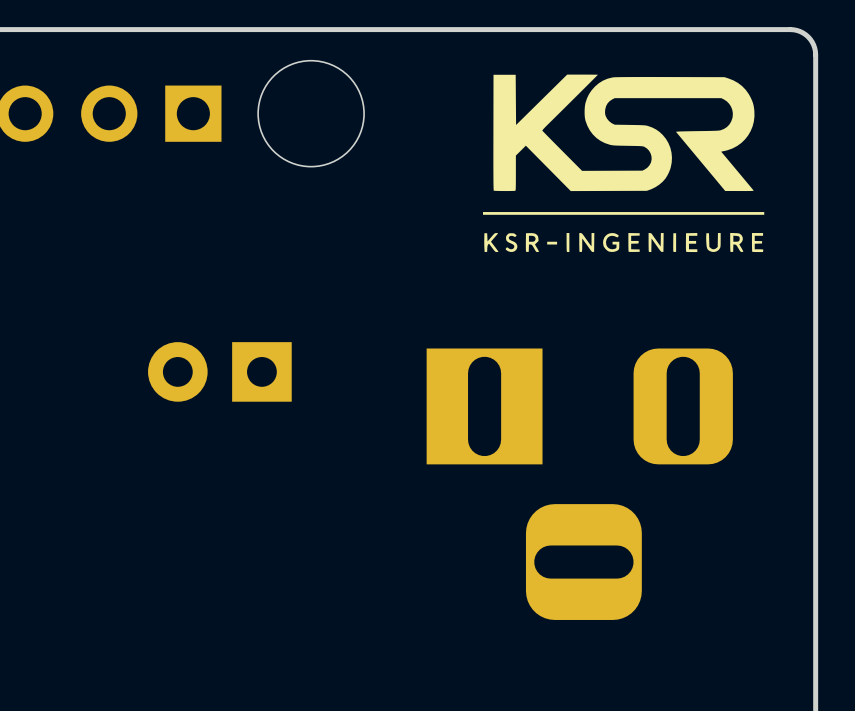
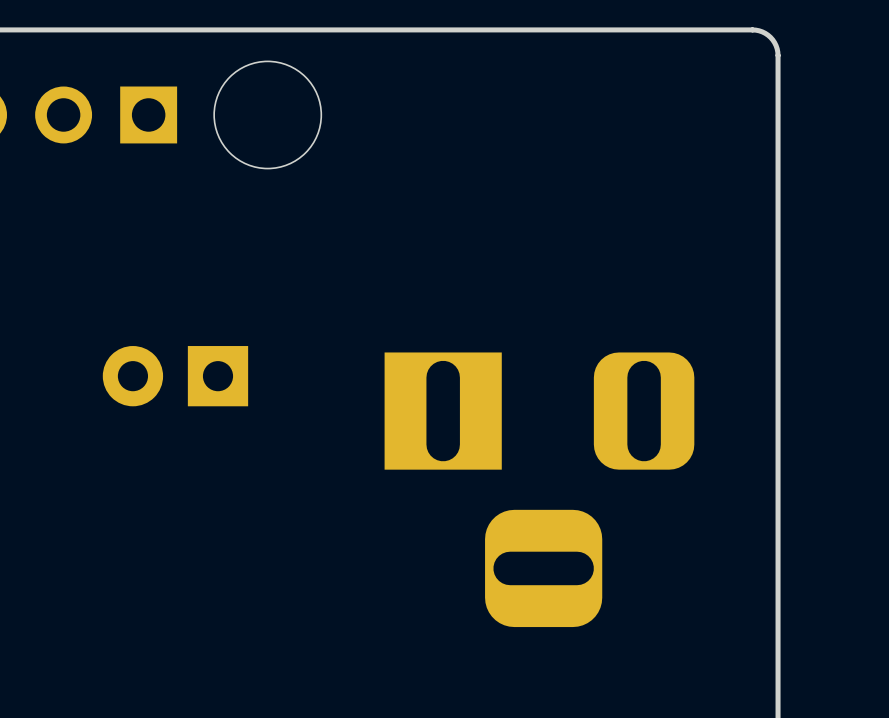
drawing: [483, 74, 765, 253] -> none

